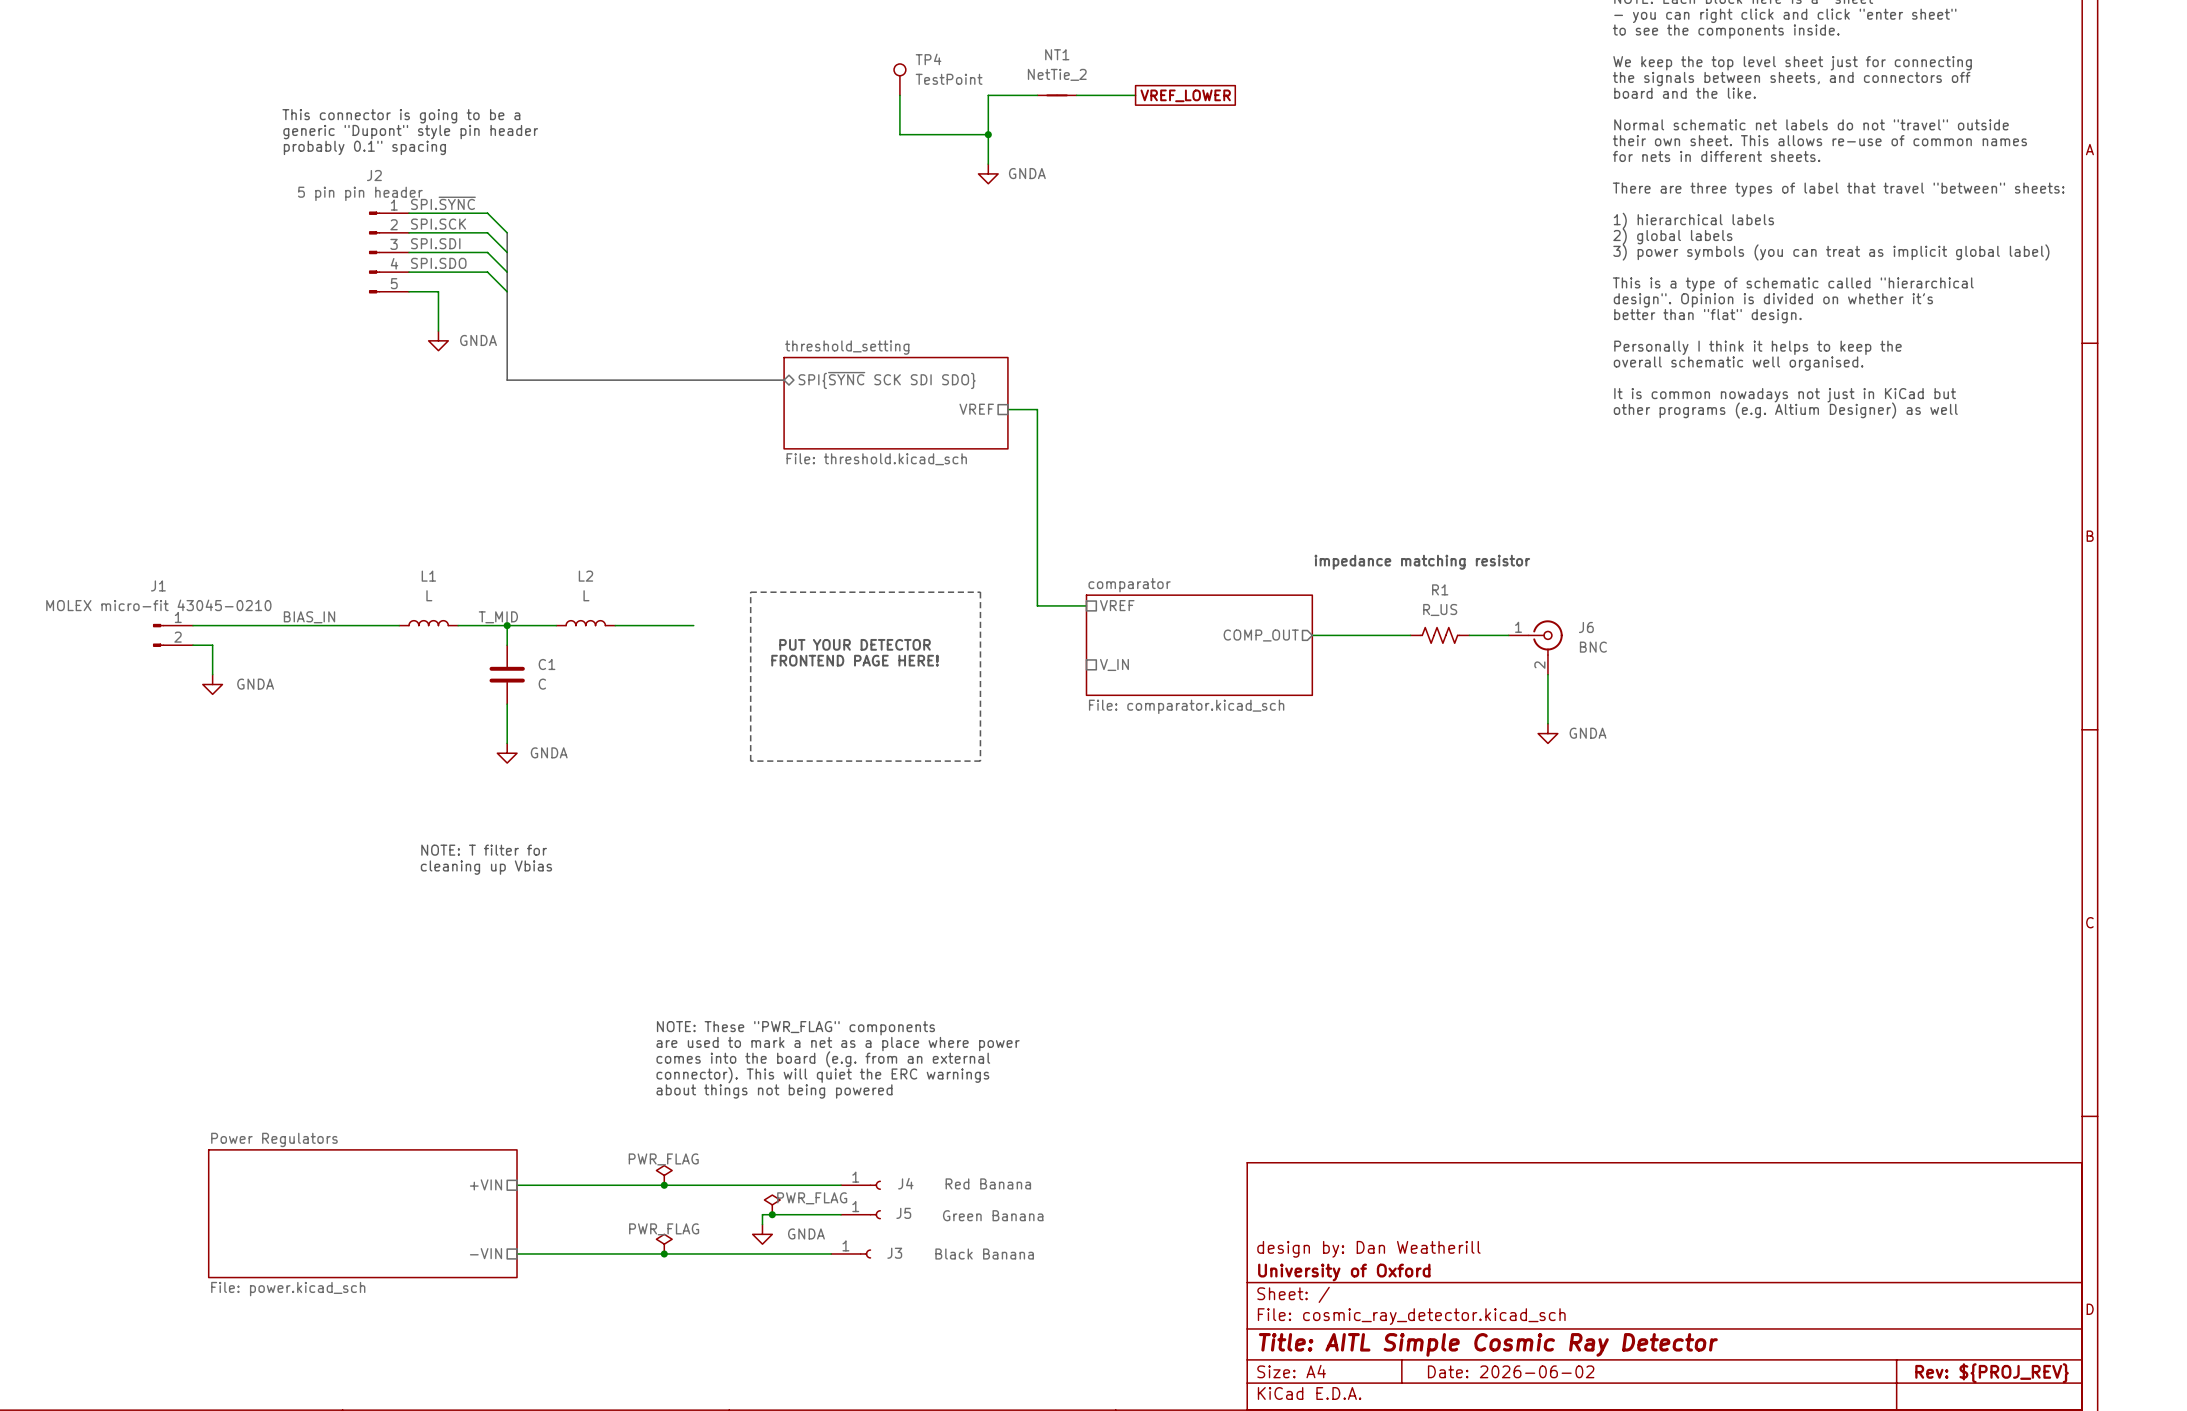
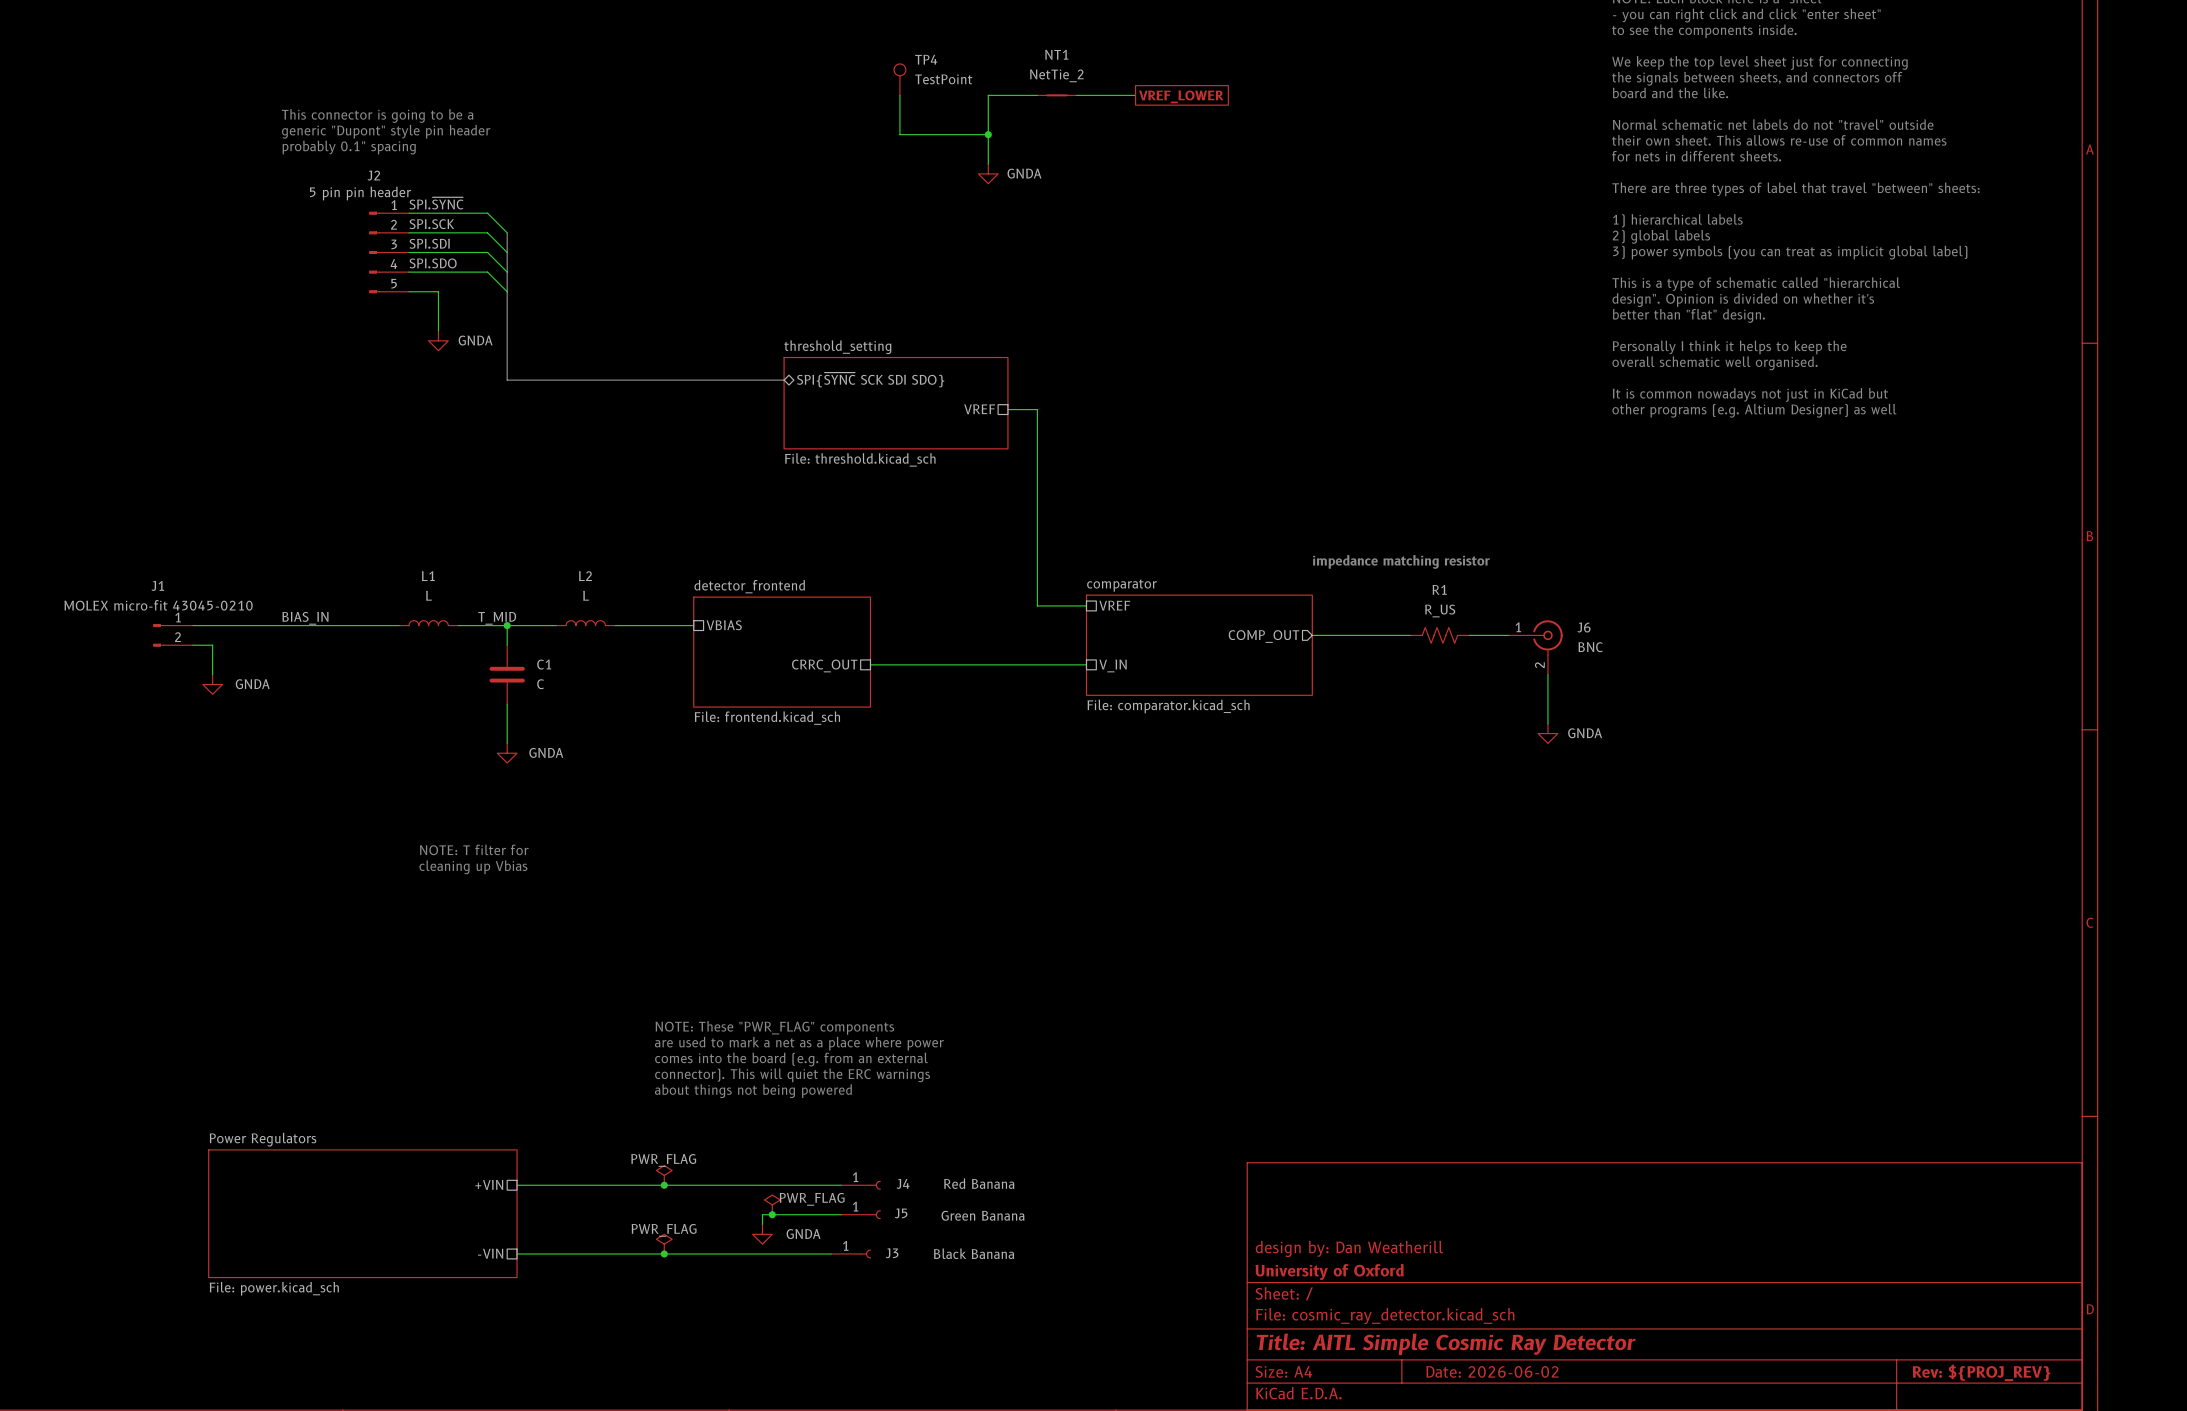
line: (750, 592) (980, 592) (980, 761) (750, 761) (750, 592) -> none
sheet pin: none -> VBIAS (724, 625)
text: PUT YOUR DETECTOR (855, 644) -> none
sheet detector_frontend: none -> File: frontend.kicad_sch (782, 652)
text: FRONTEND PAGE HERE! (855, 660) -> none
sheet pin: none -> CRRC_OUT (824, 665)
wire: none -> (870, 664) (1086, 664)

